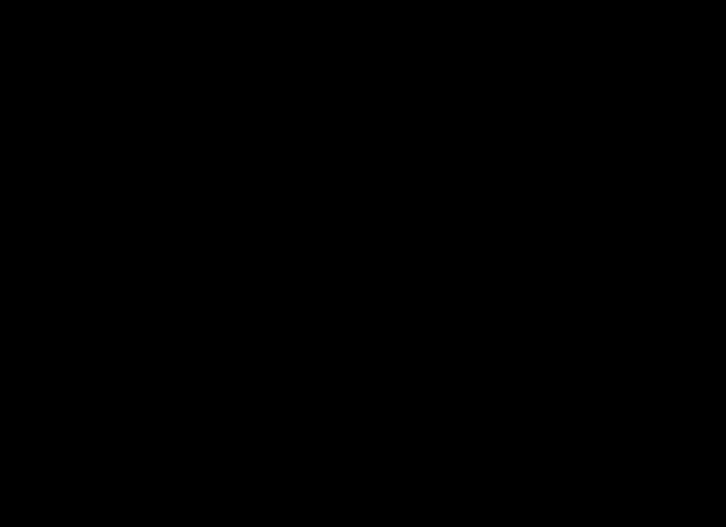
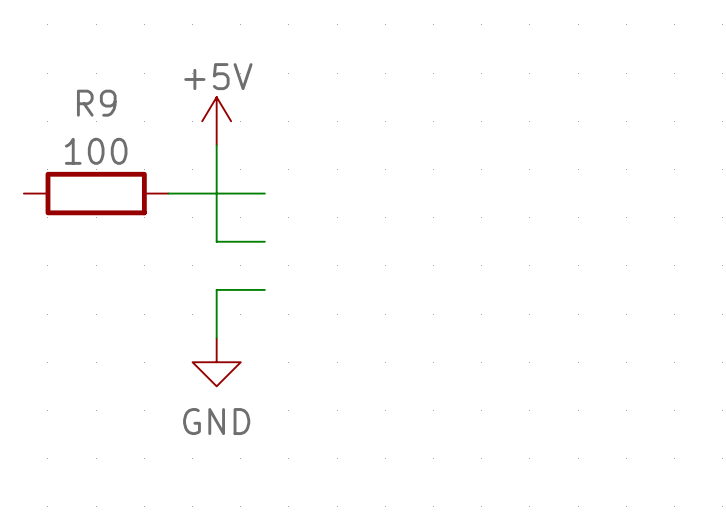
power symbol: none -> +5V (216, 121)
wire: none -> (216, 145) (216, 241) (264, 241)
R9: none -> 100 (96, 193)
wire: none -> (168, 193) (264, 193)
wire: none -> (264, 289) (216, 289) (216, 338)
power symbol: none -> GND (216, 362)

